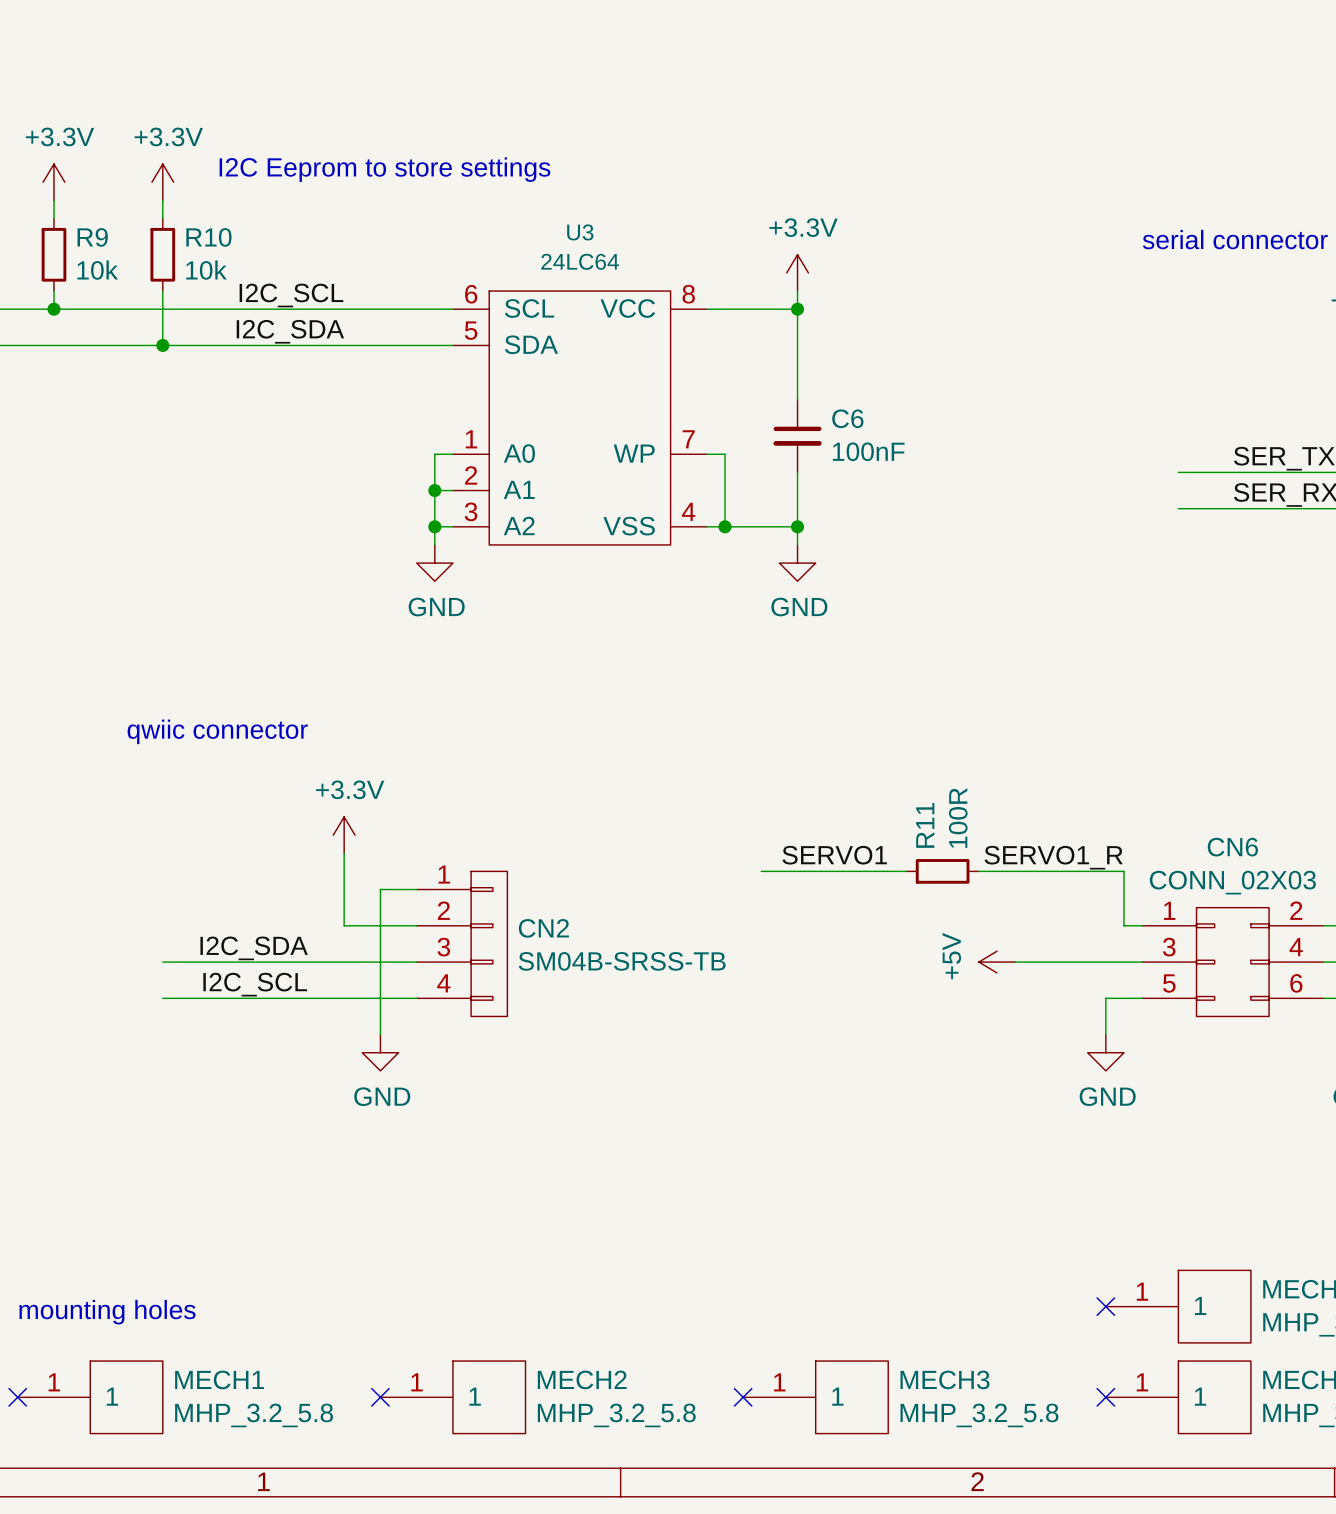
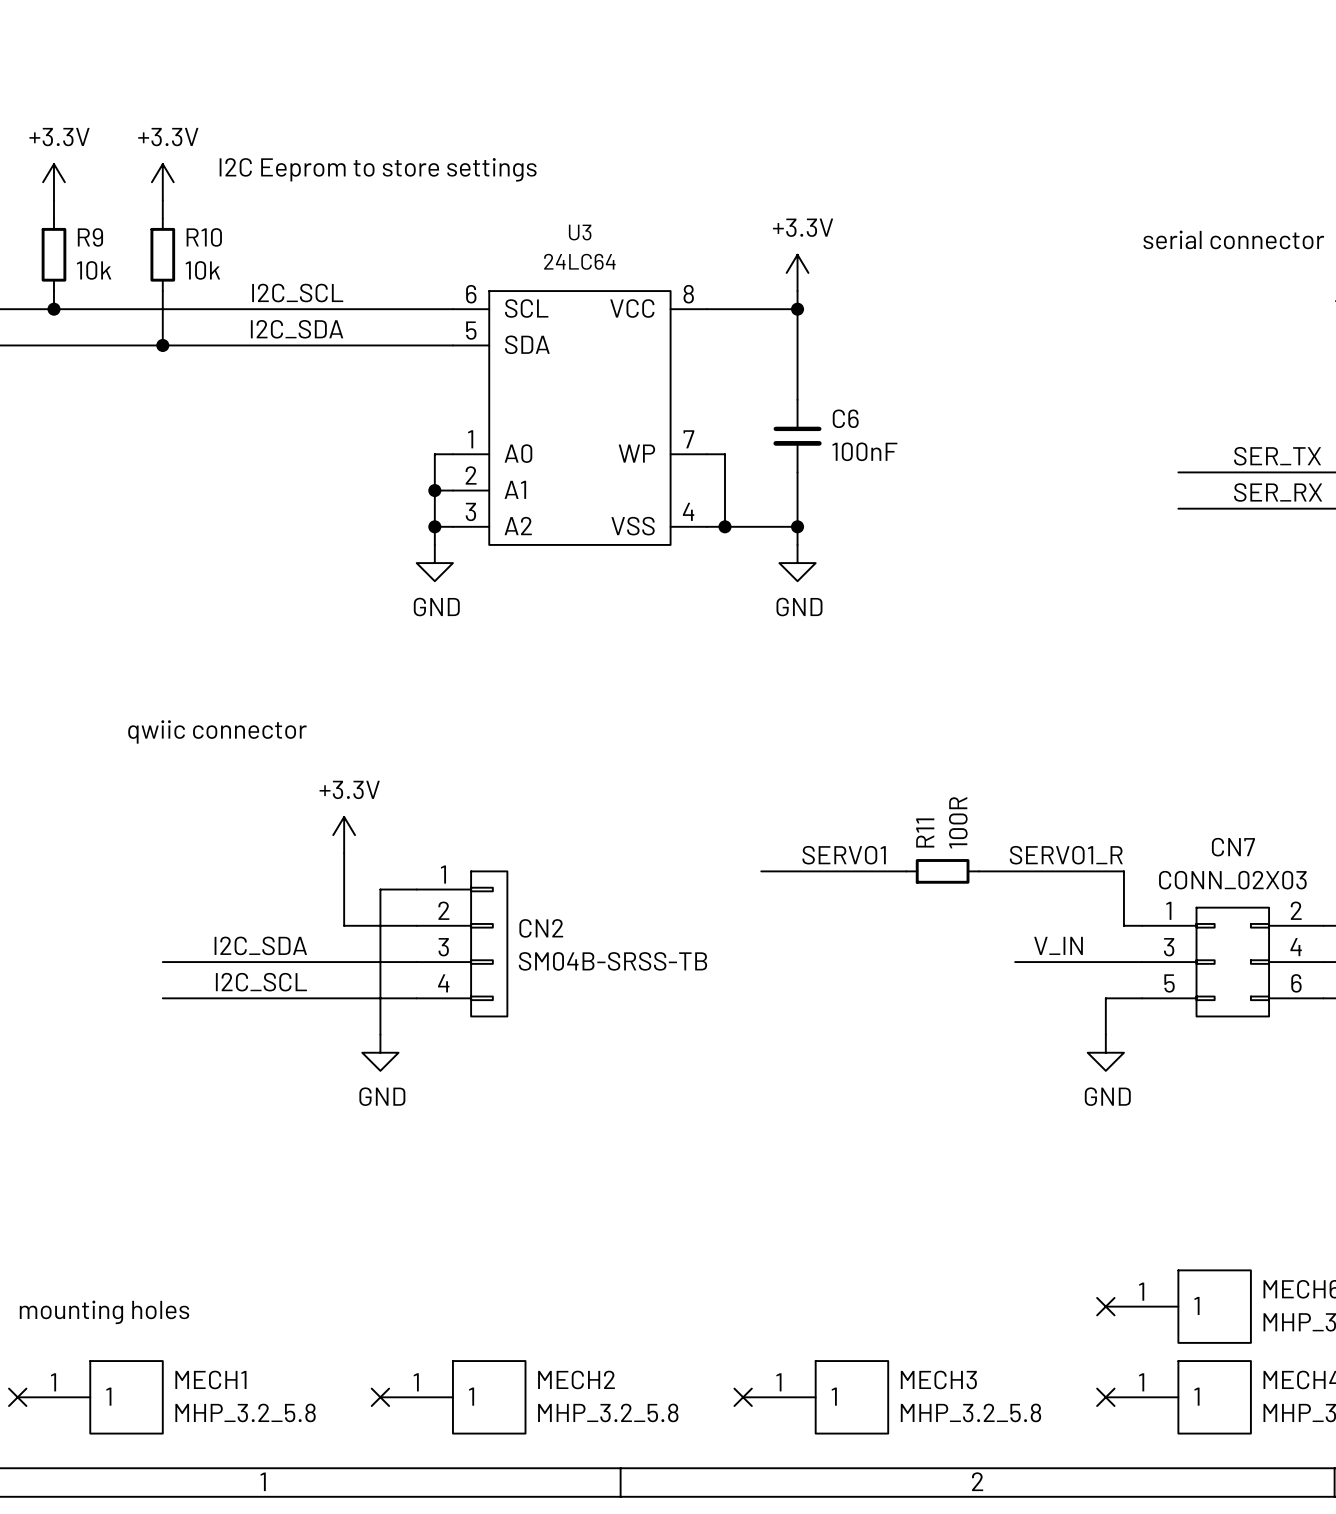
CN6 name: CN6 (1232, 847) -> CN7 (1233, 847)
label: none -> V_IN (1058, 945)
power symbol: +5V (997, 962) -> none

